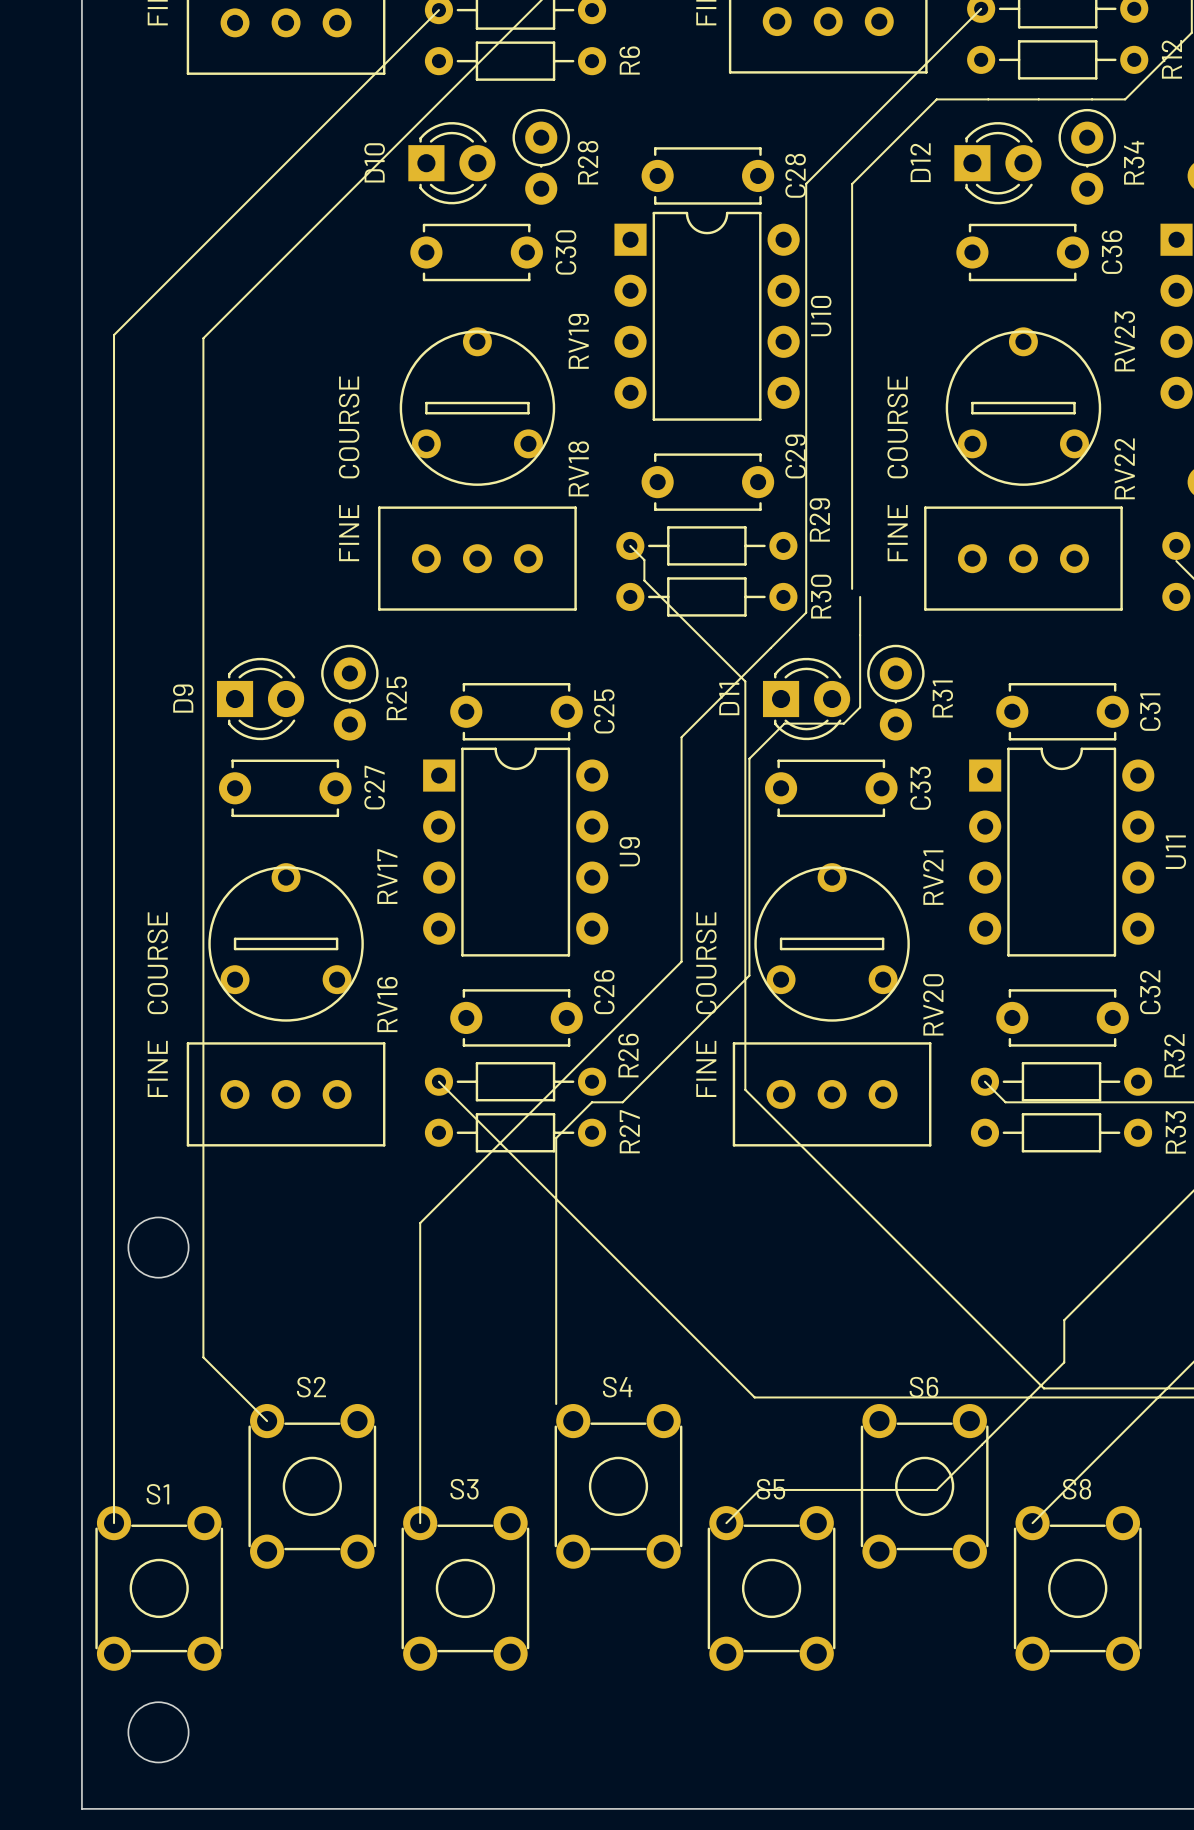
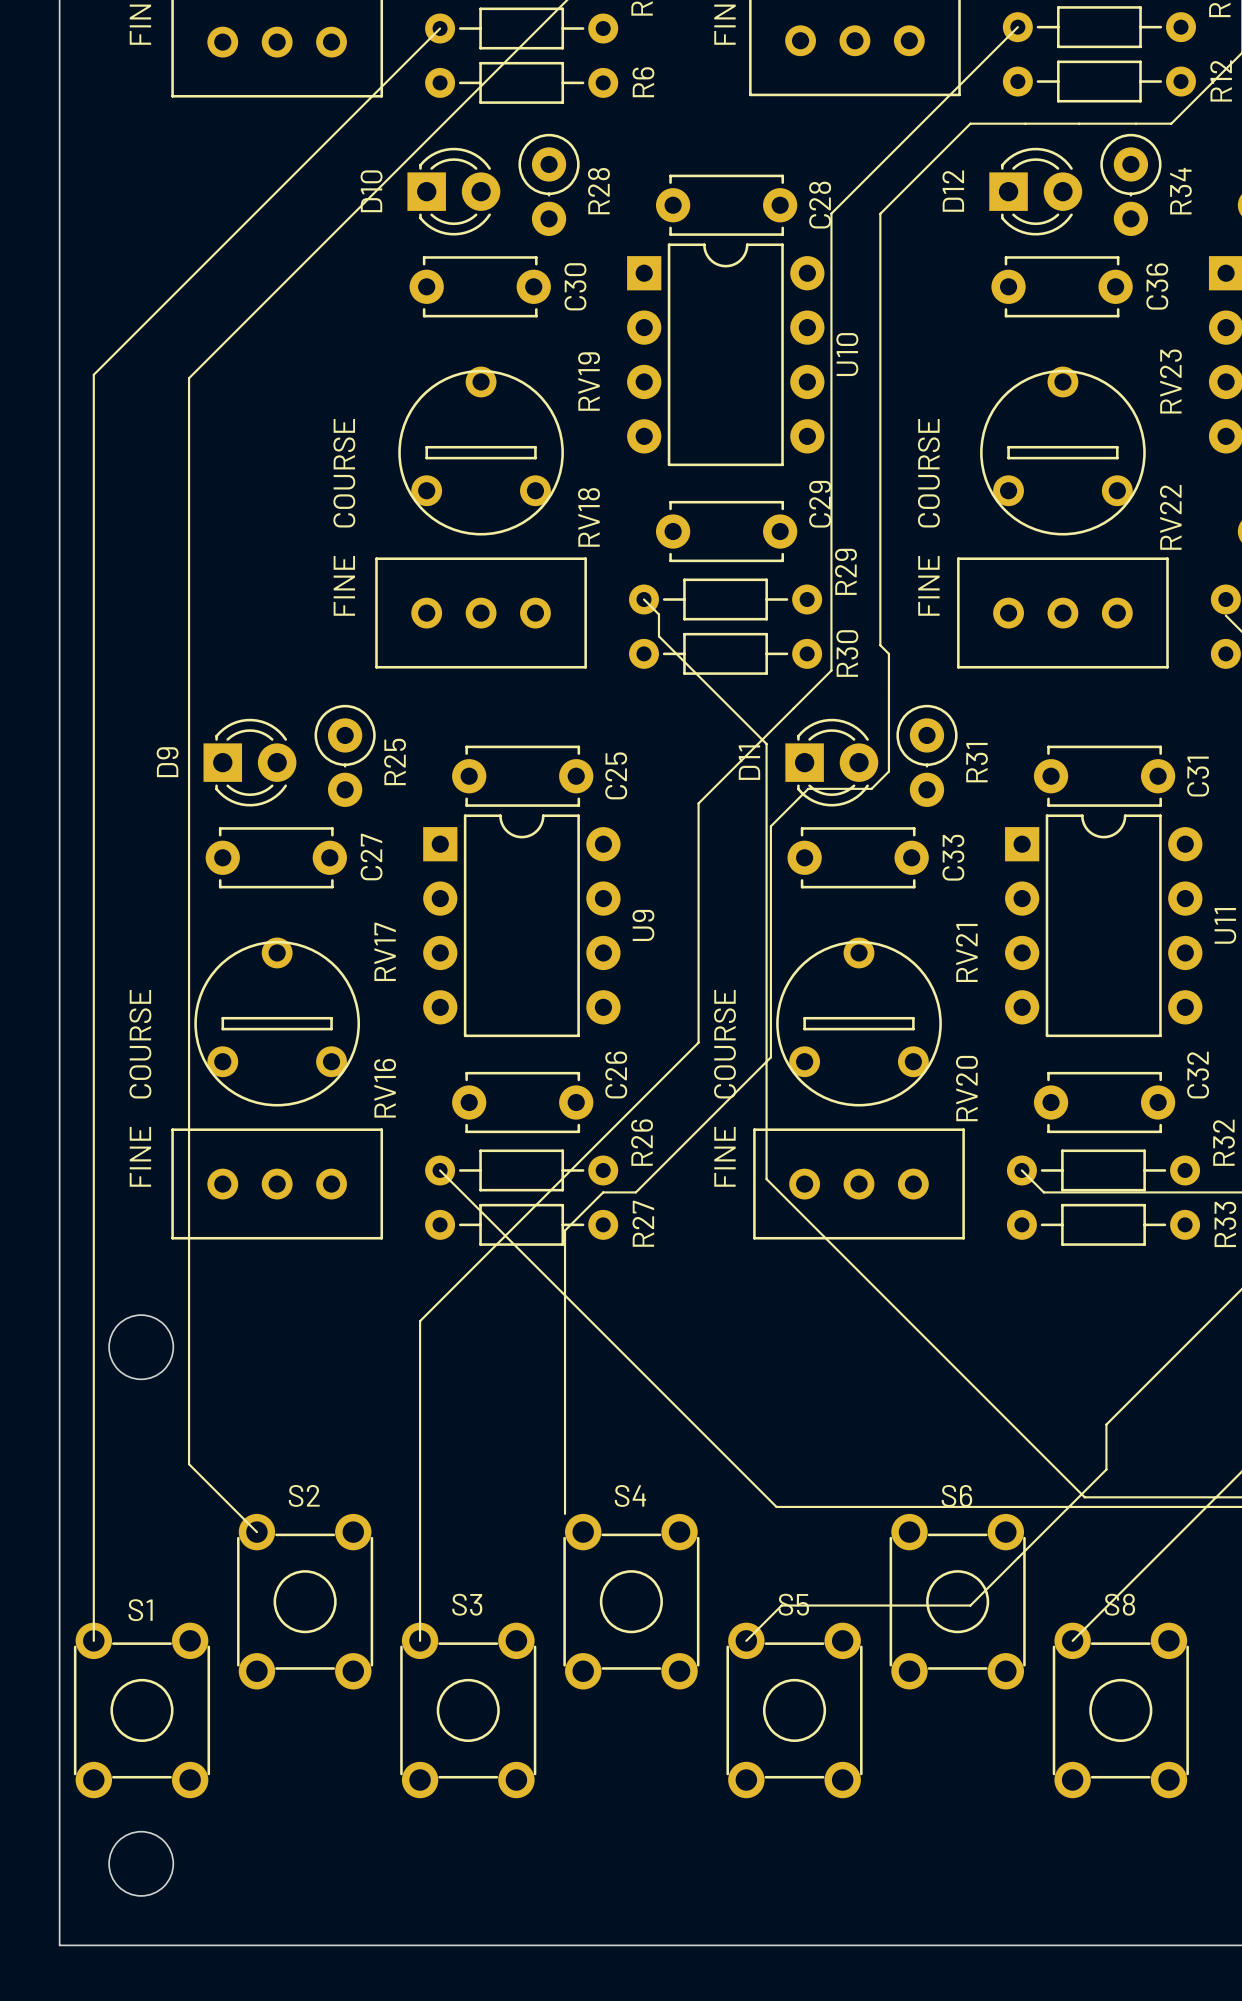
line: none -> (880, 645) (888, 653)

